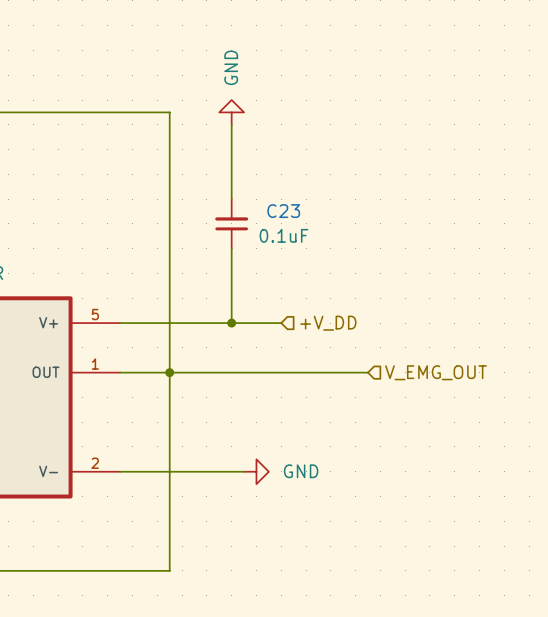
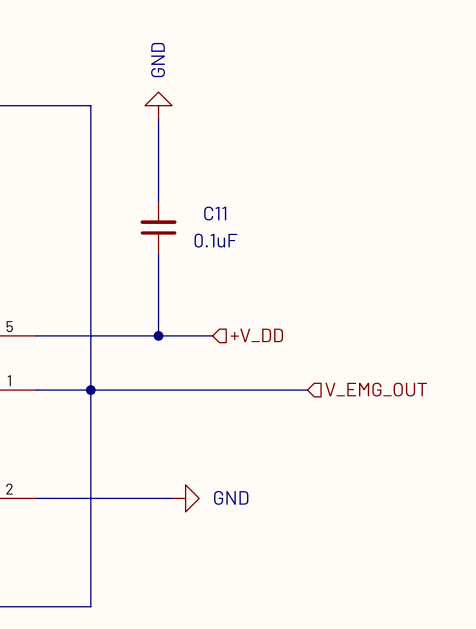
C23 name: C23 (283, 211) -> C11 (215, 213)

